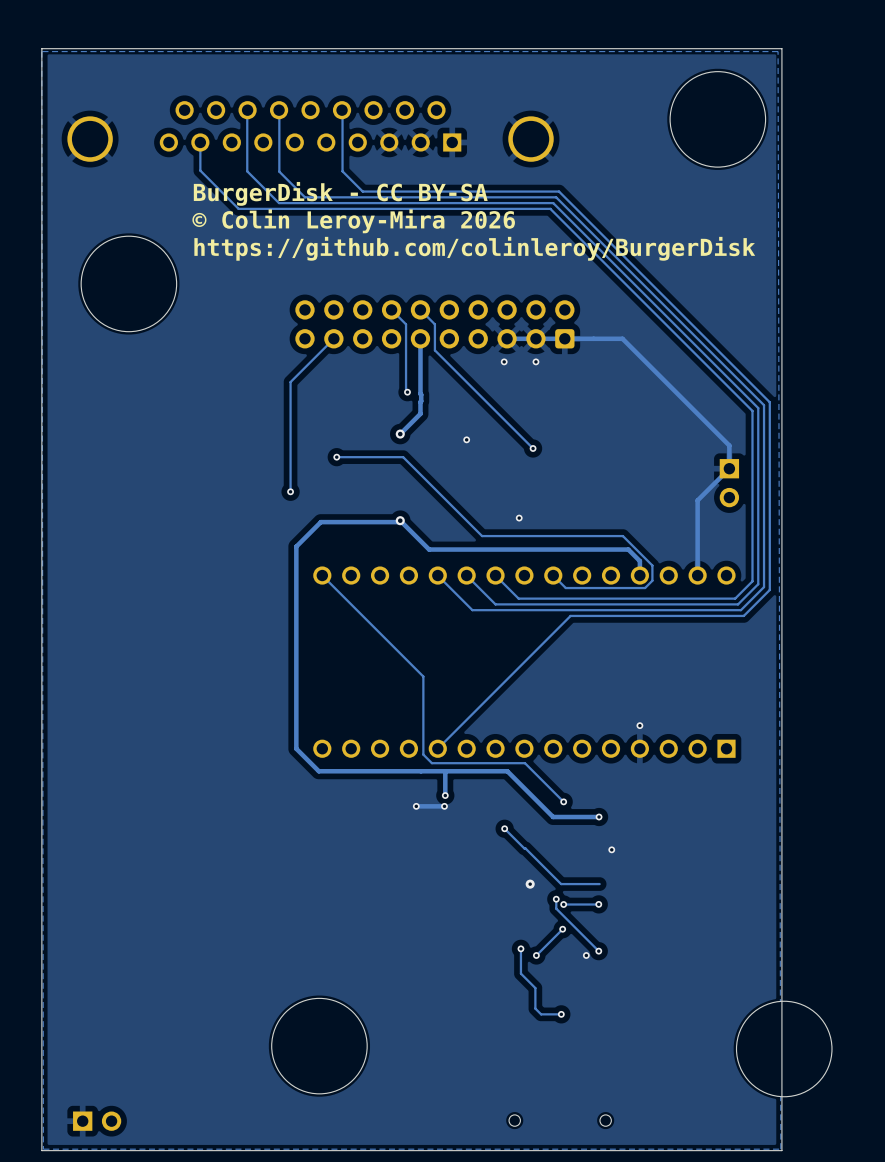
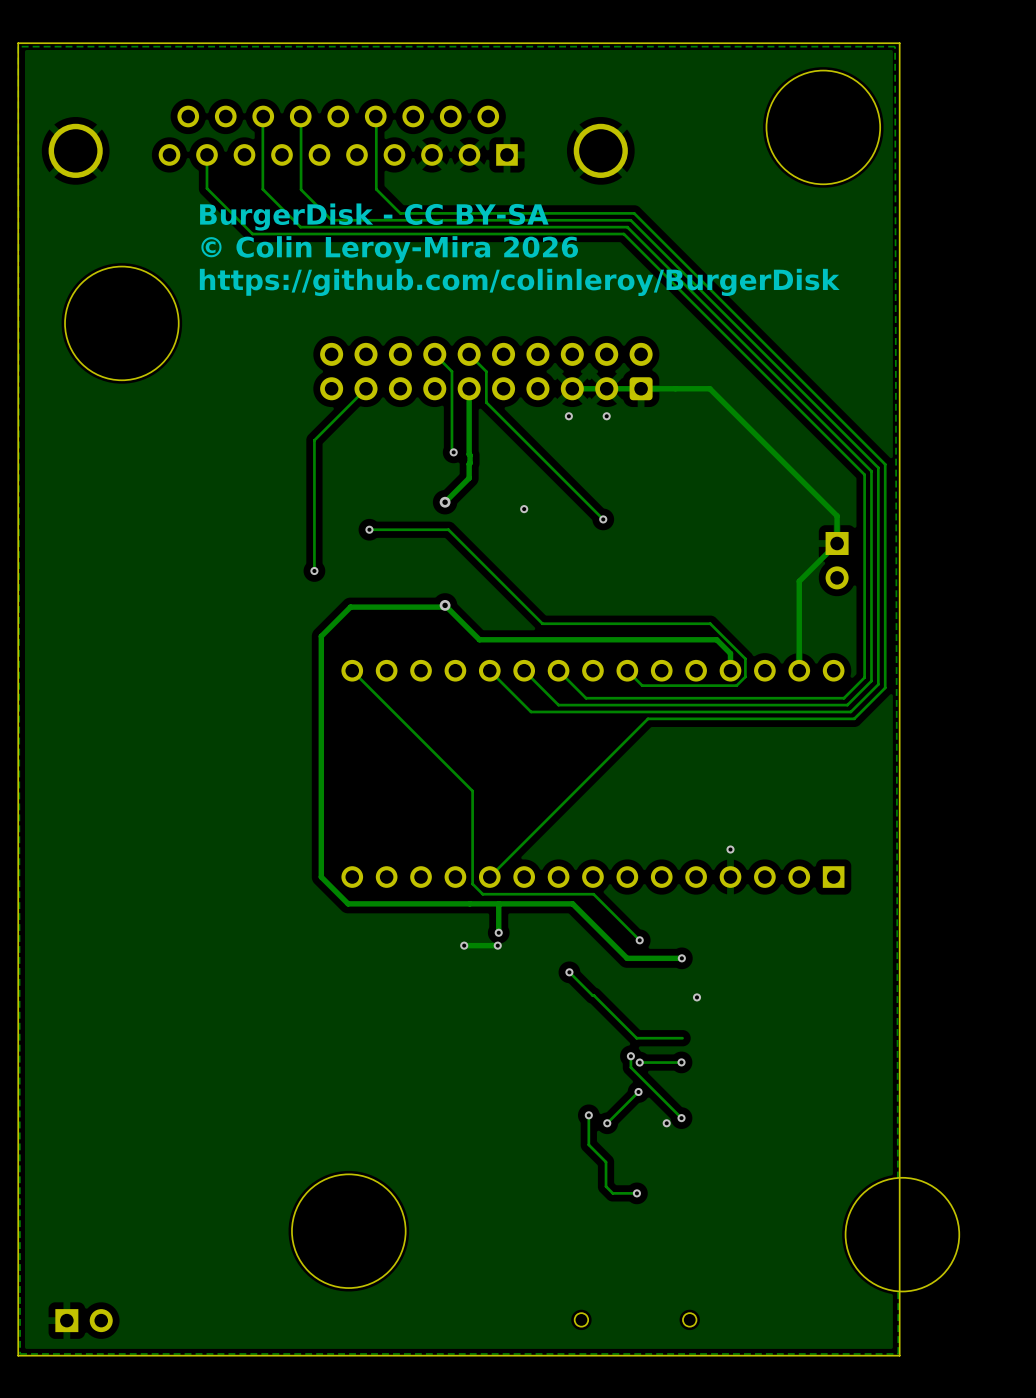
via: (519, 518) -> none
via: (530, 884) -> none

